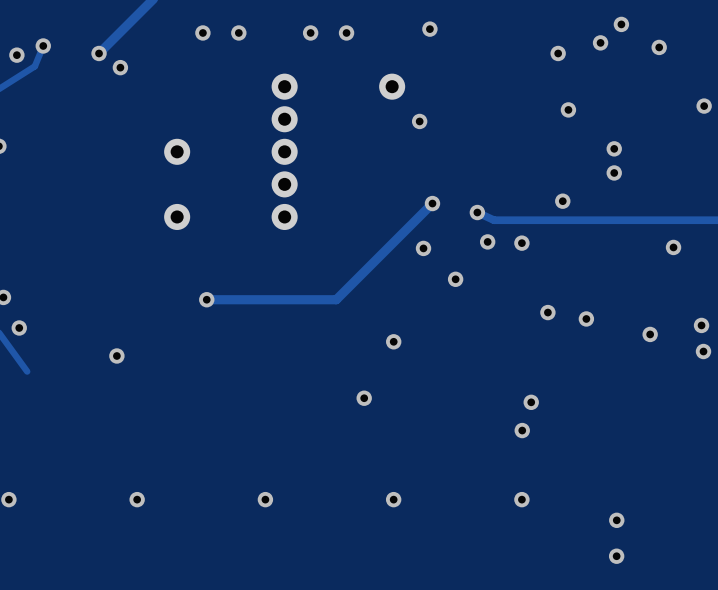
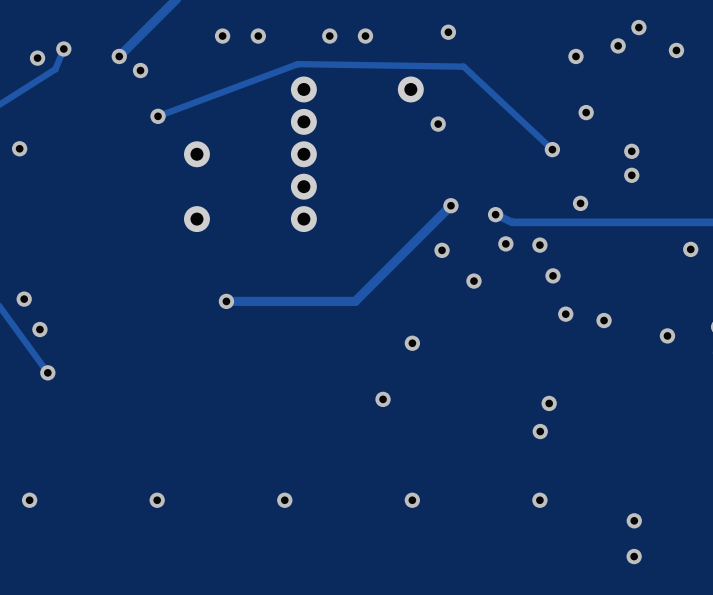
track: none -> (158, 116) (297, 64) (463, 66) (552, 149)
via: none -> (158, 116)
via: none -> (552, 149)
via: none -> (553, 275)
via position: (116, 355) -> (47, 372)

